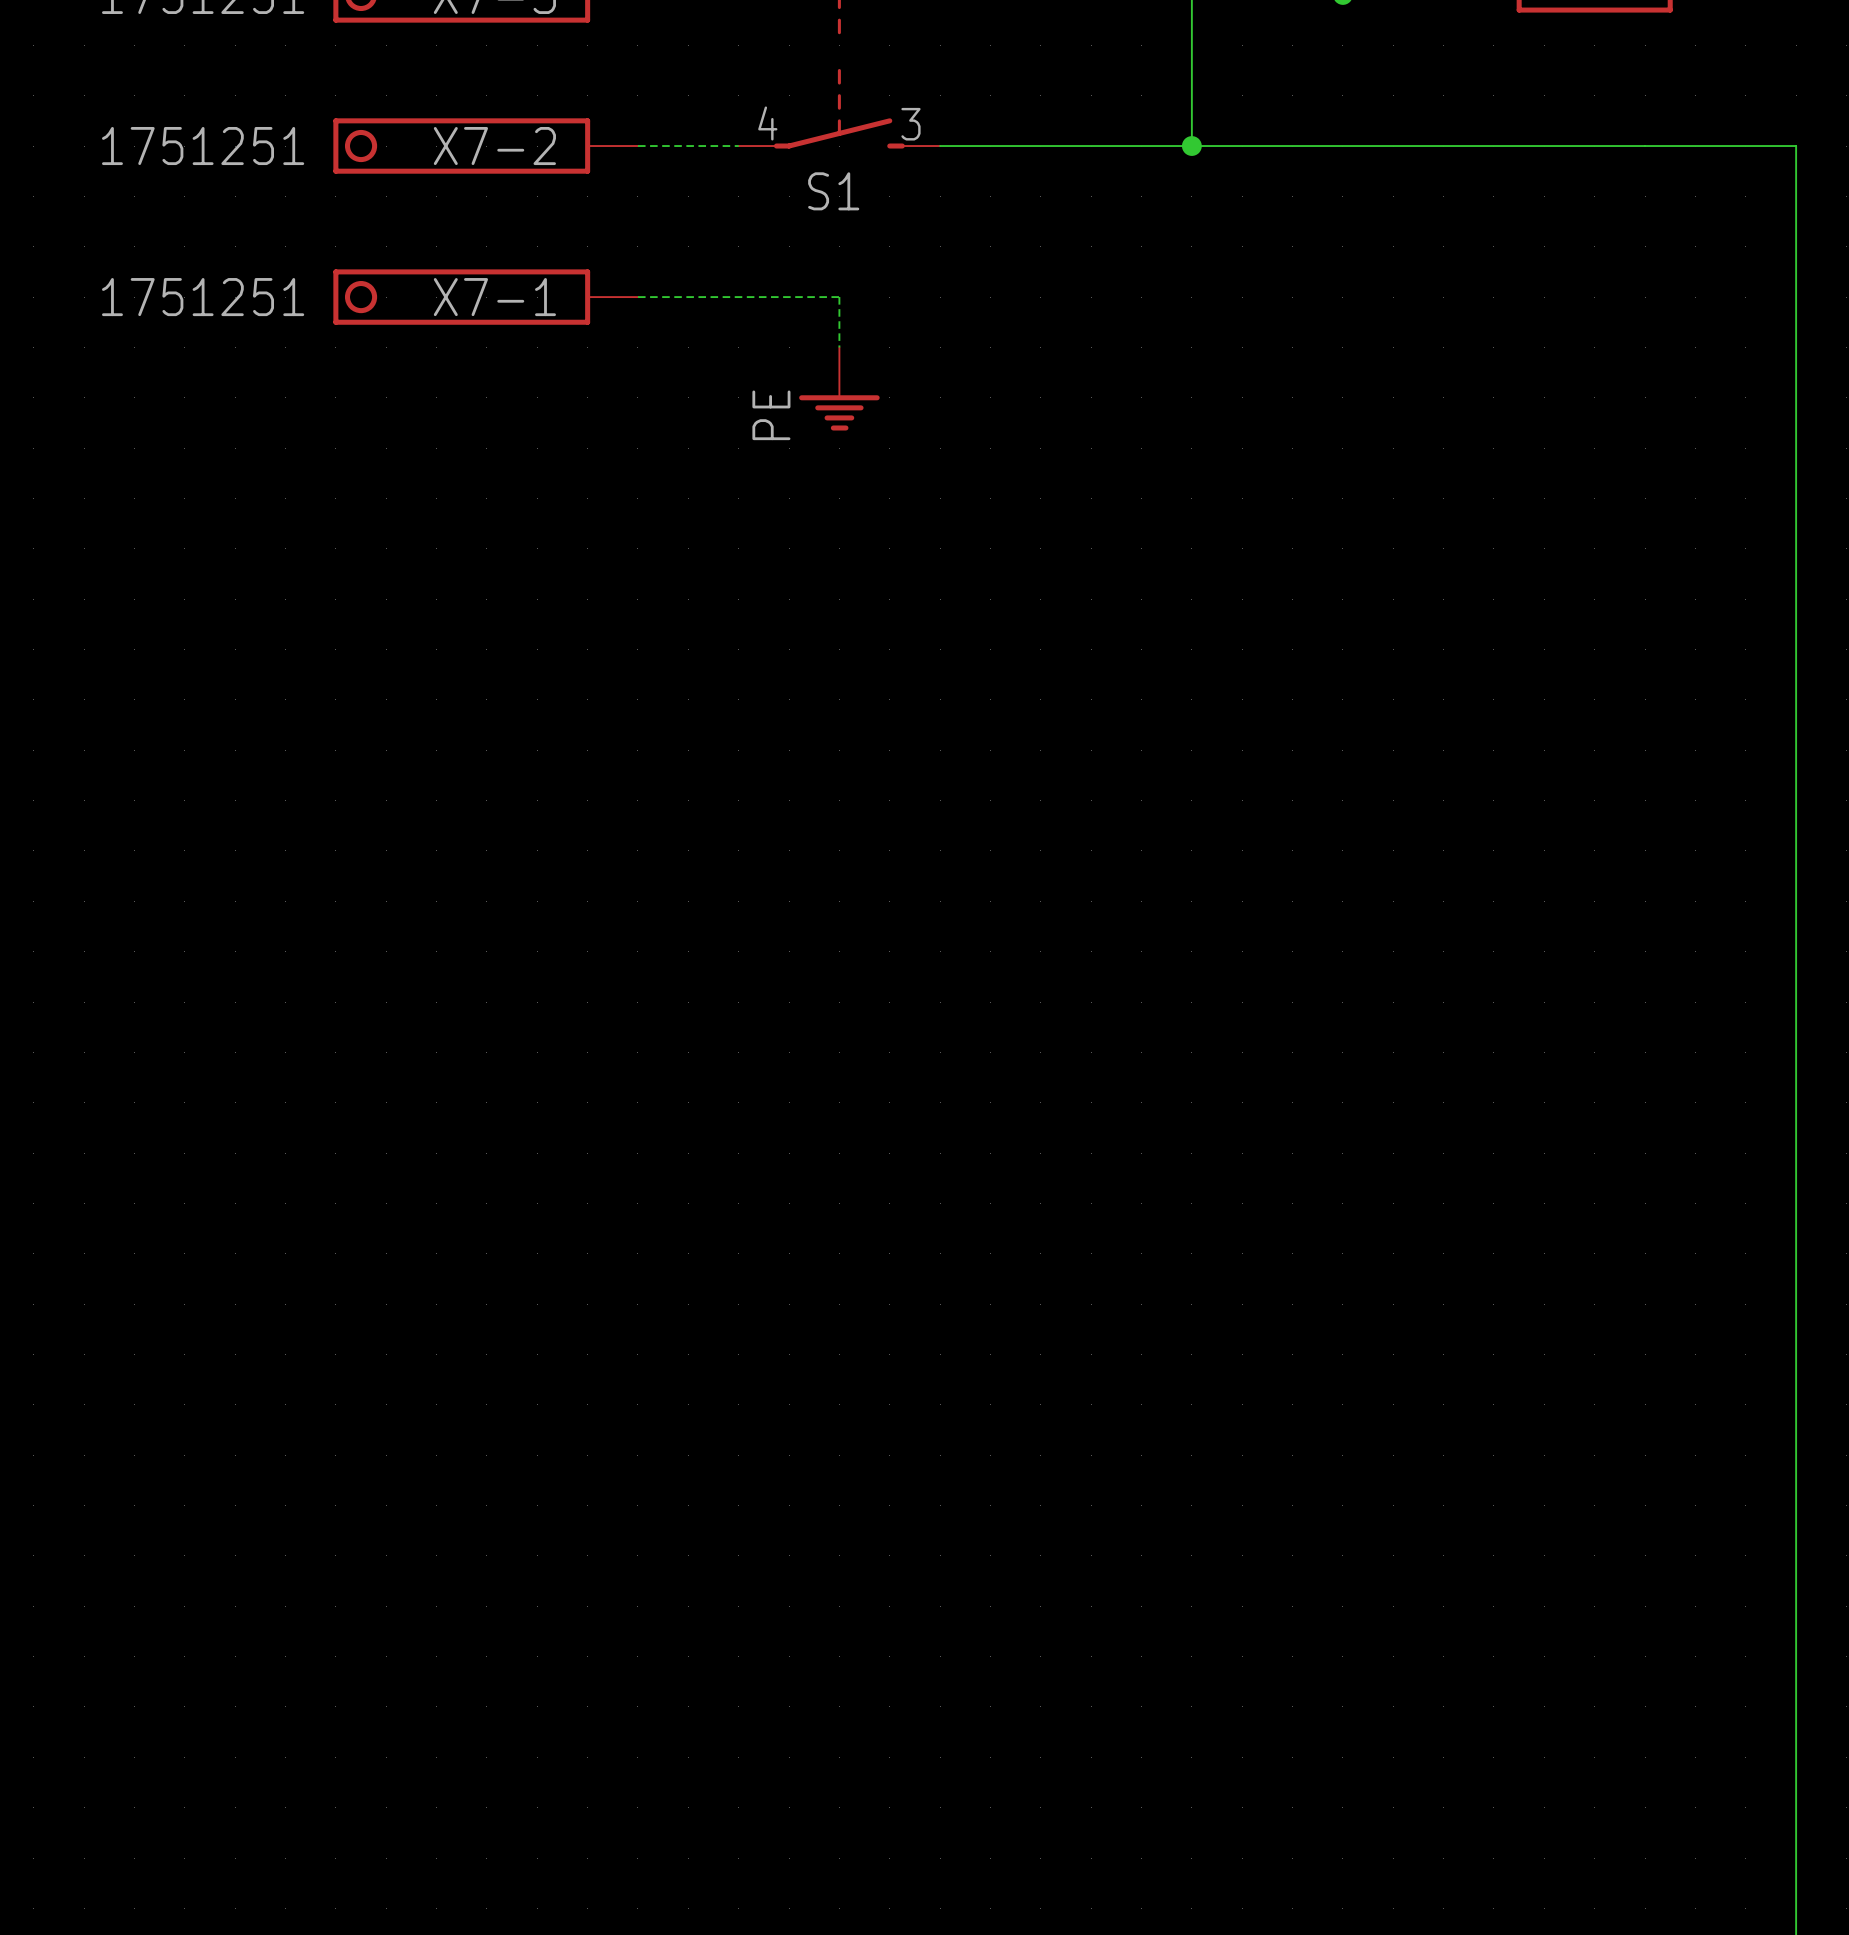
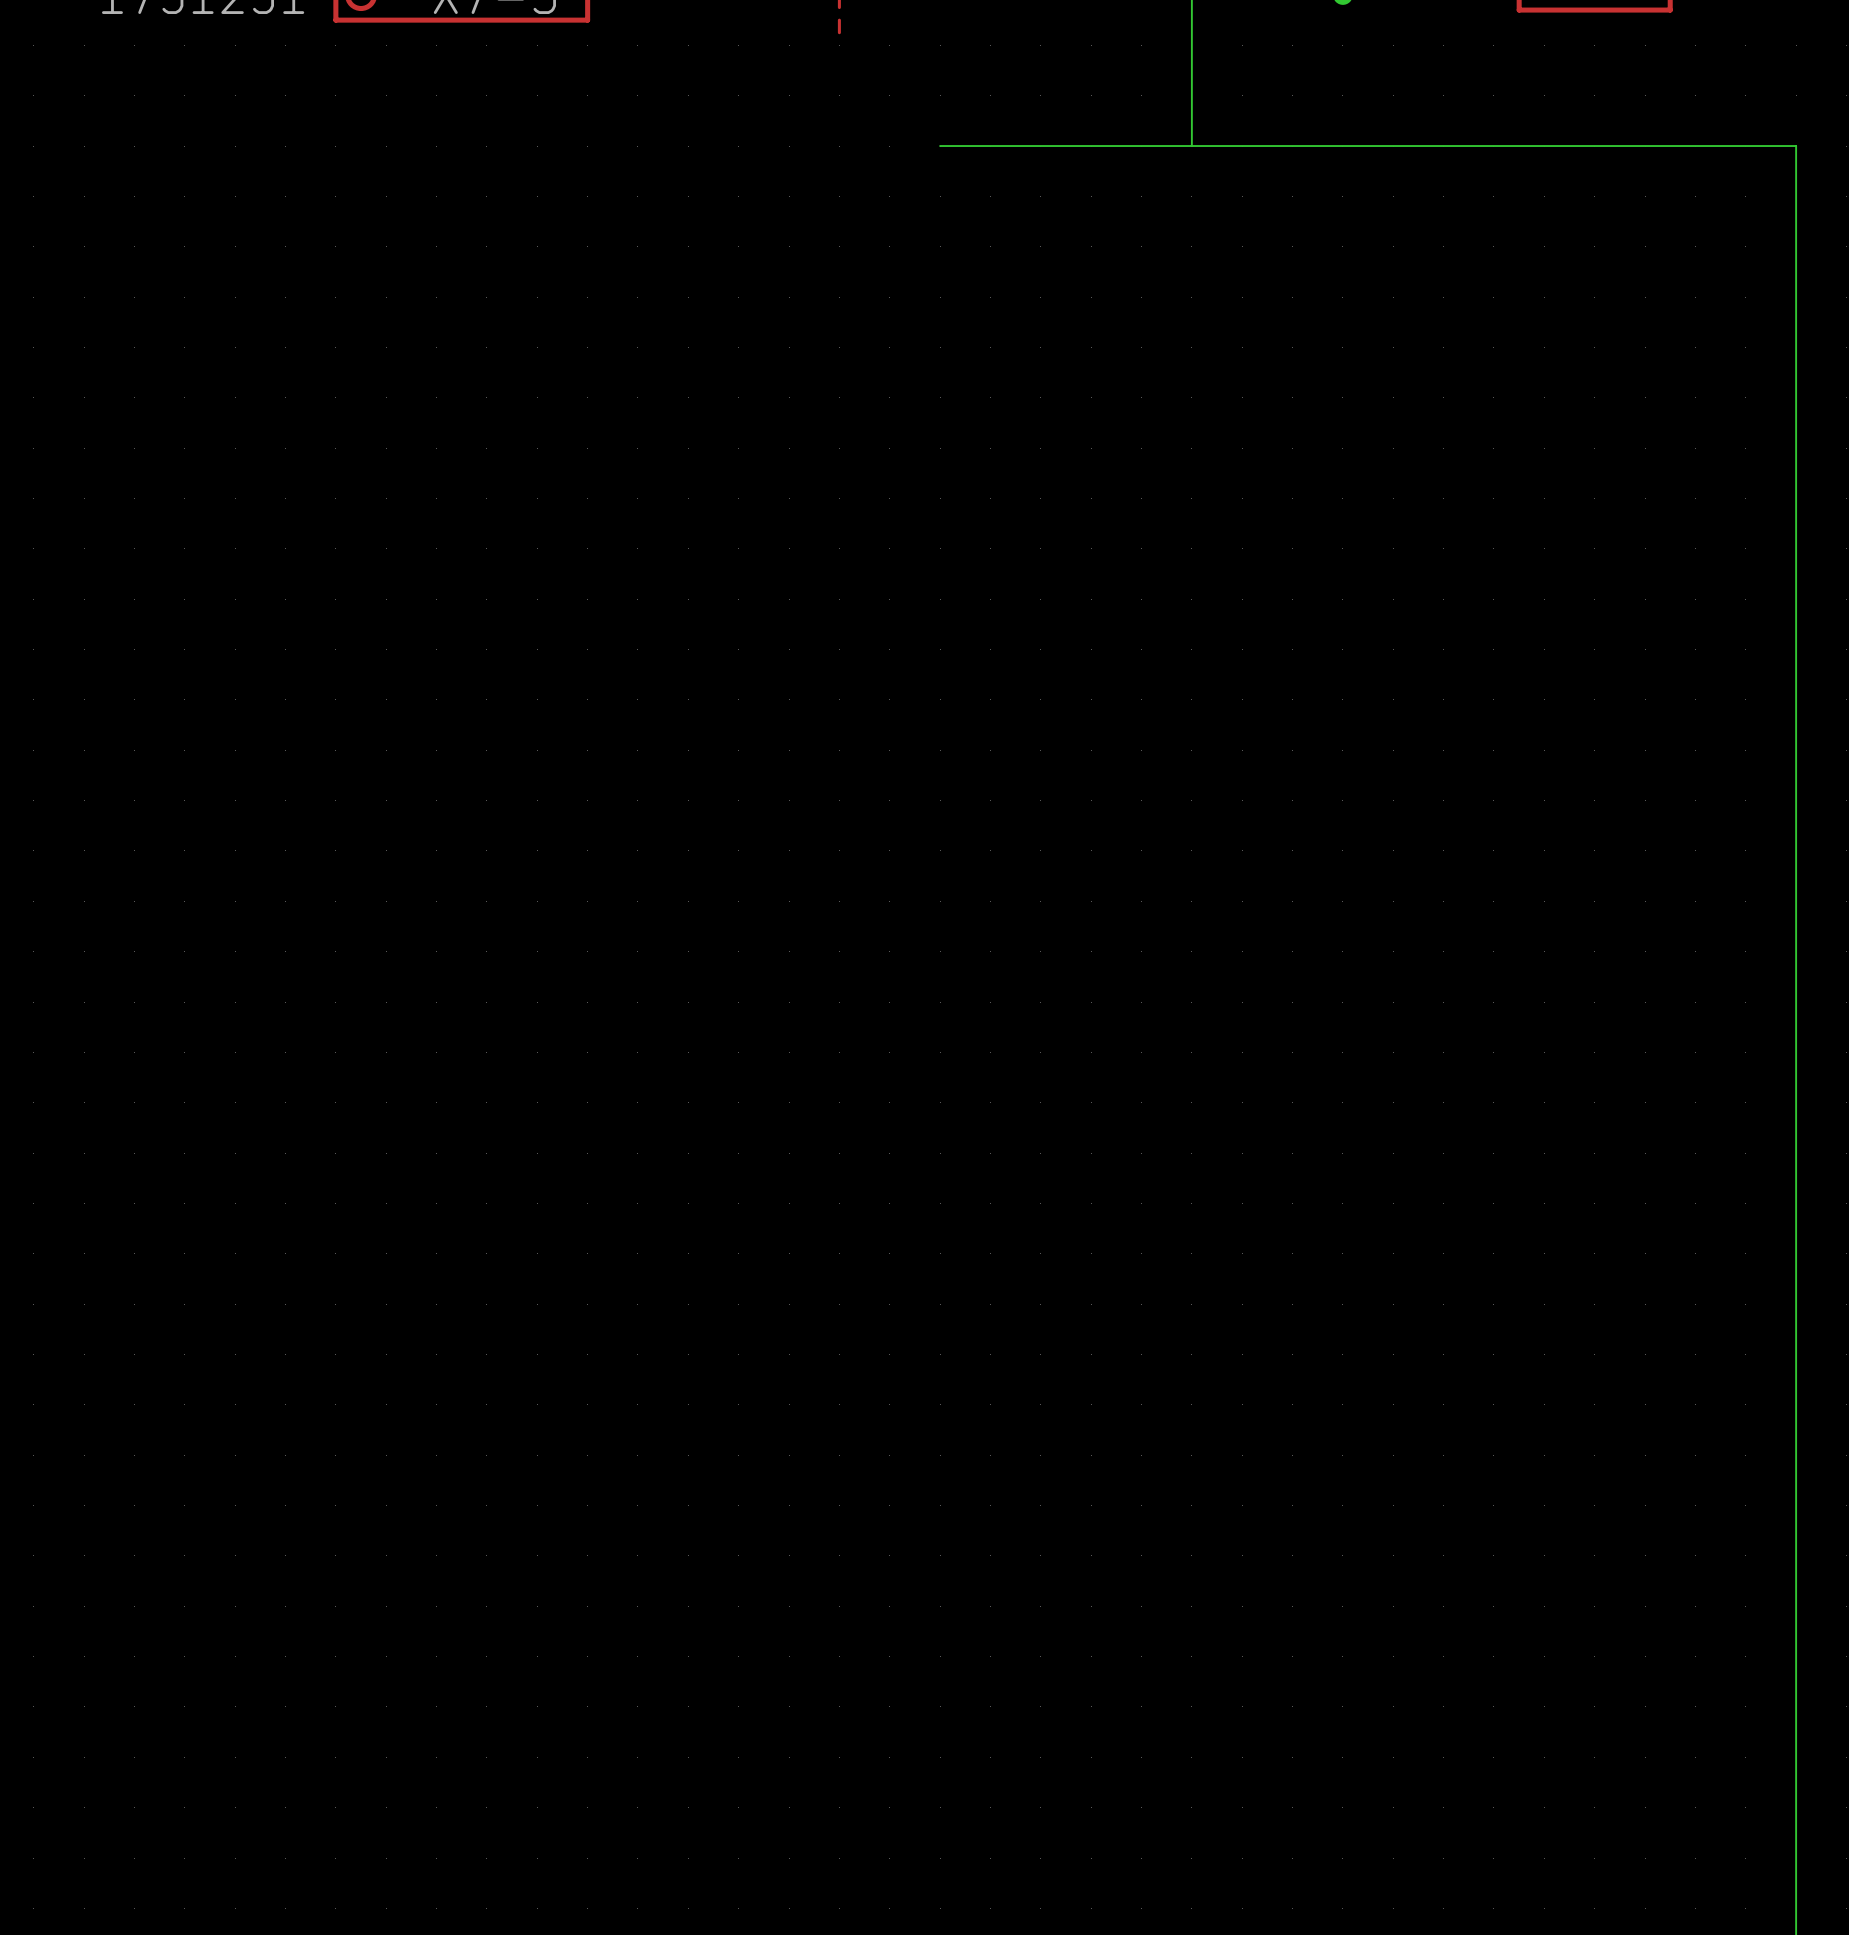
S1: (839, 108) -> none
X7-2: 1751251 (485, 146) -> none
wire: (637, 146) (738, 146) -> none
junction: (1191, 146) -> none
X7-1: 1751251 (485, 297) -> none
wire: (637, 297) (839, 297) (839, 347) -> none
power symbol: PE (839, 388) -> none

